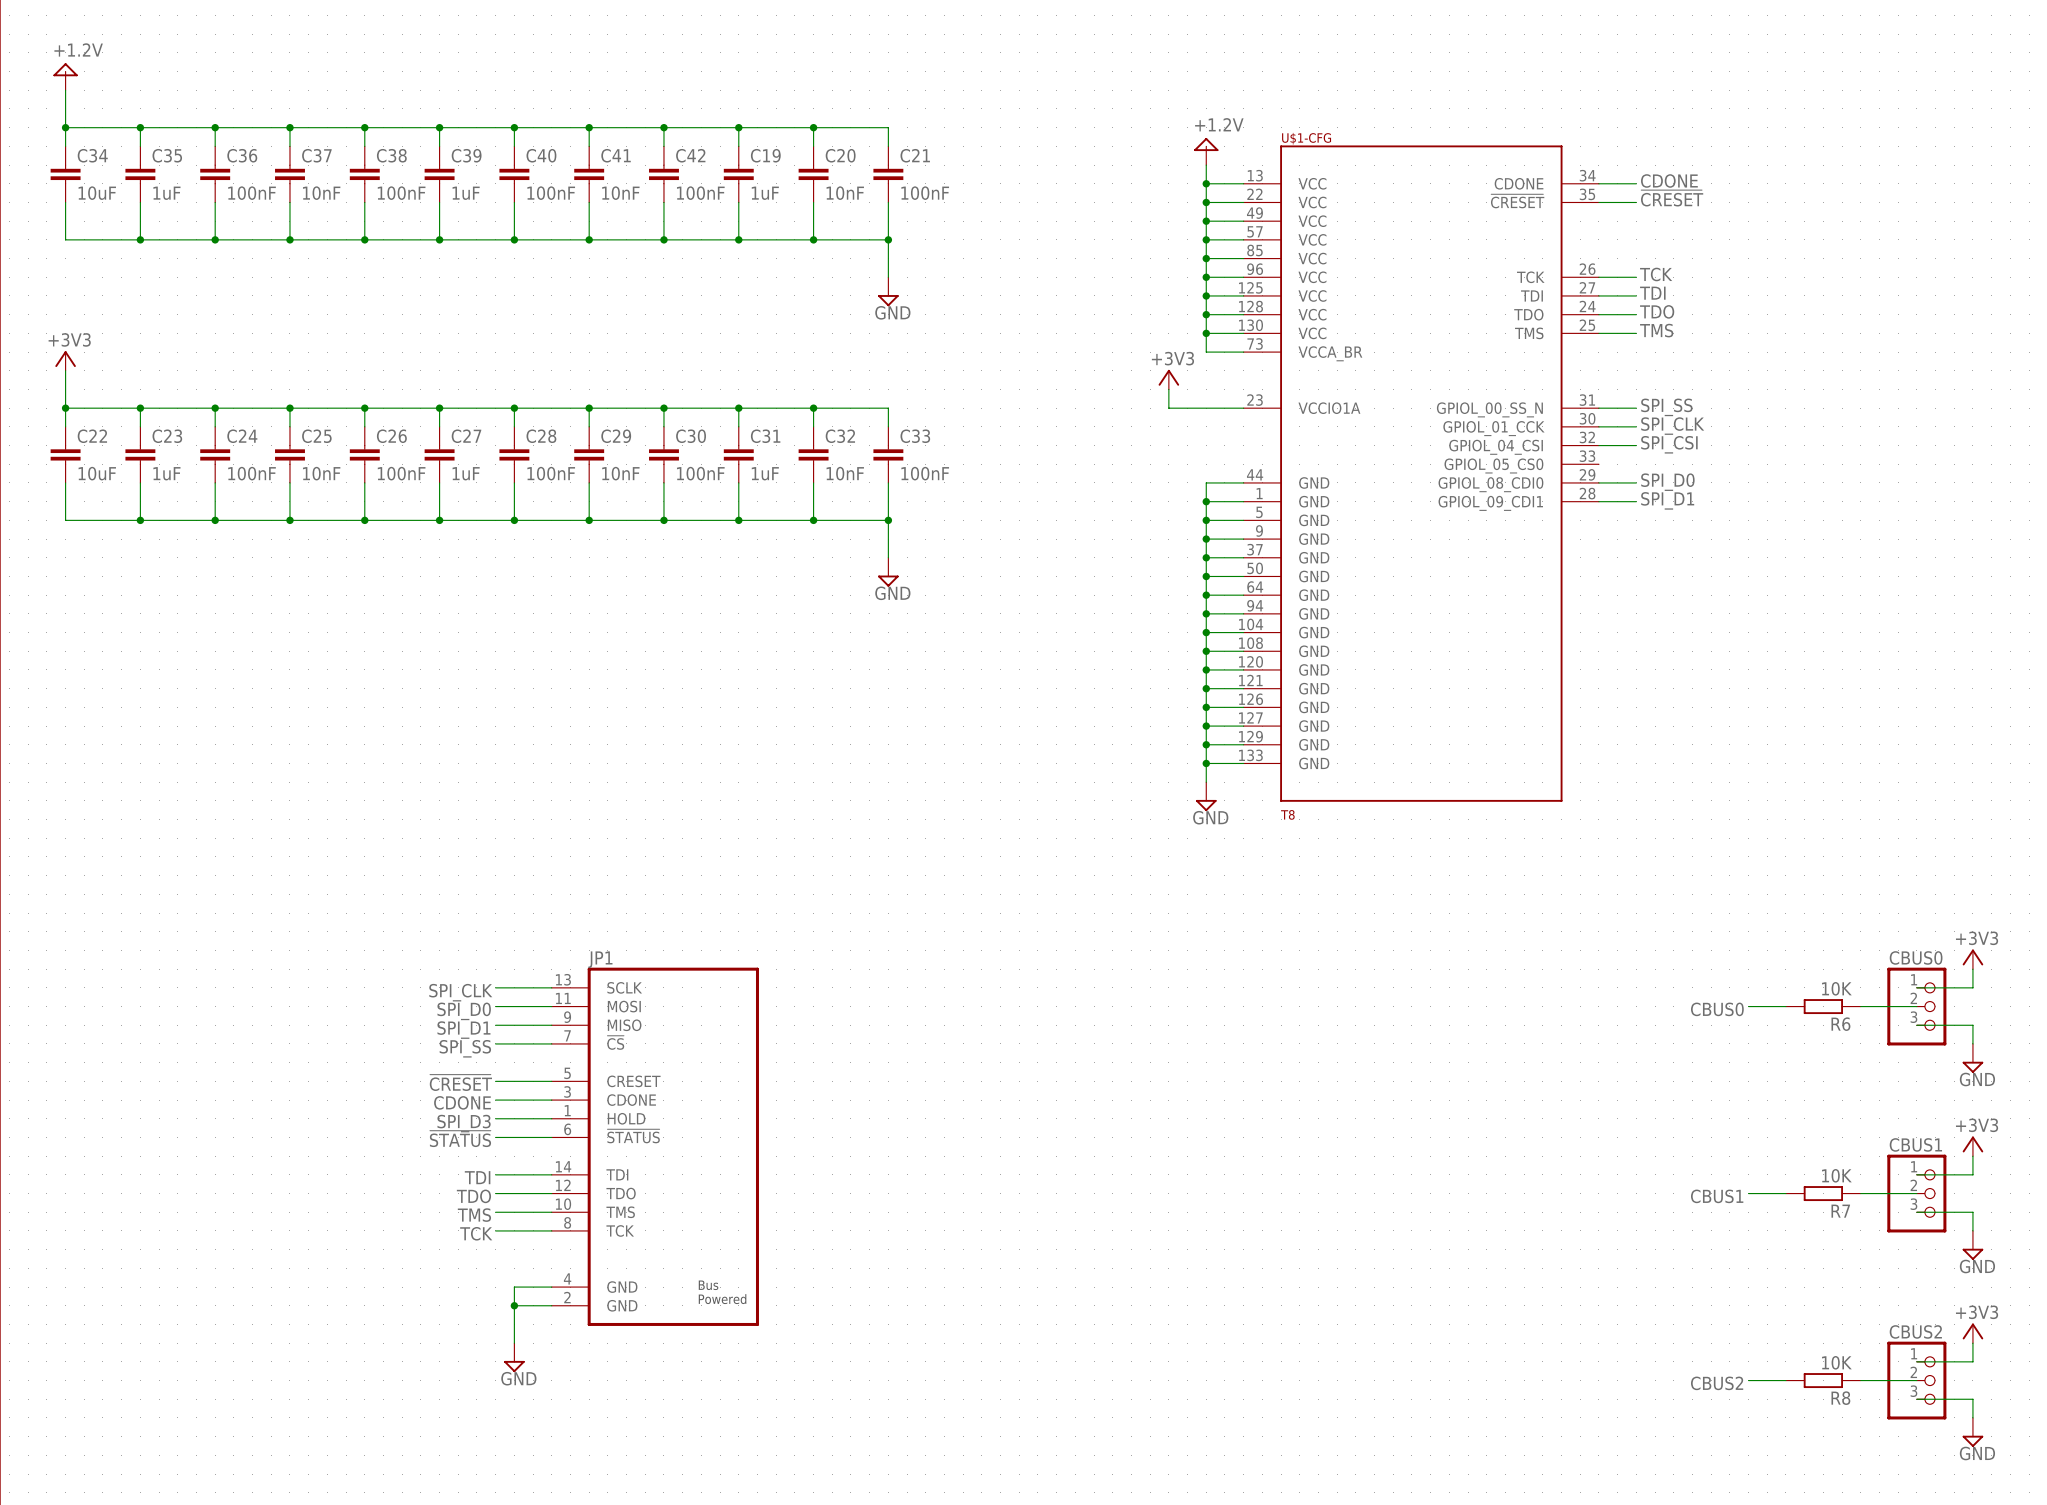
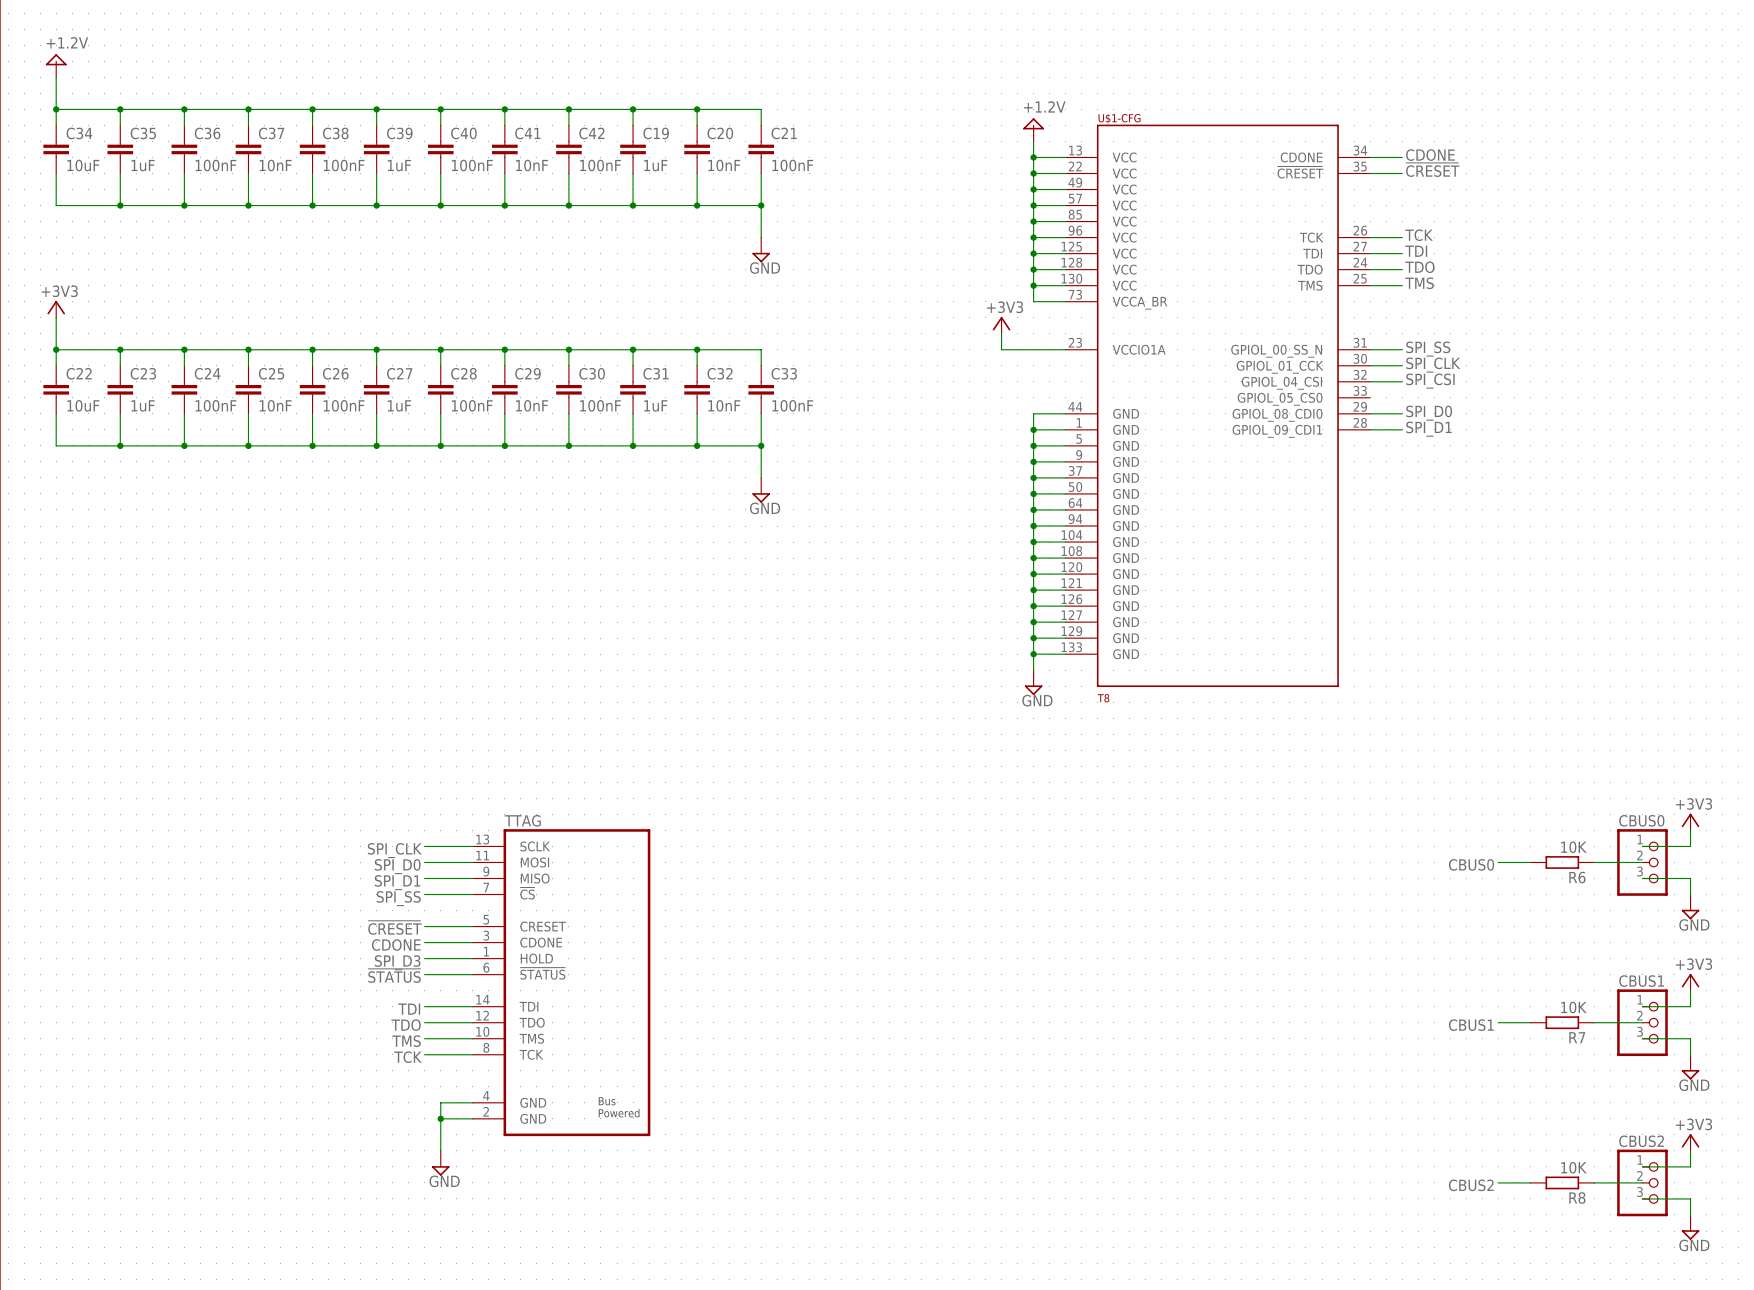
JP1 name: JP1 (600, 959) -> TTAG (522, 820)

